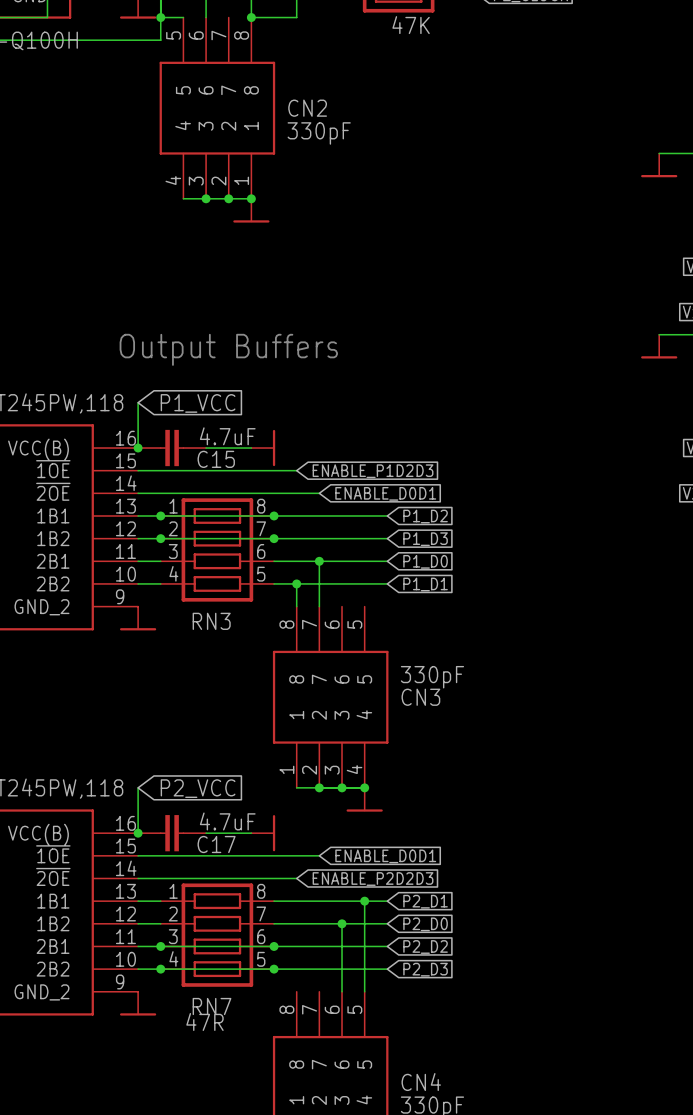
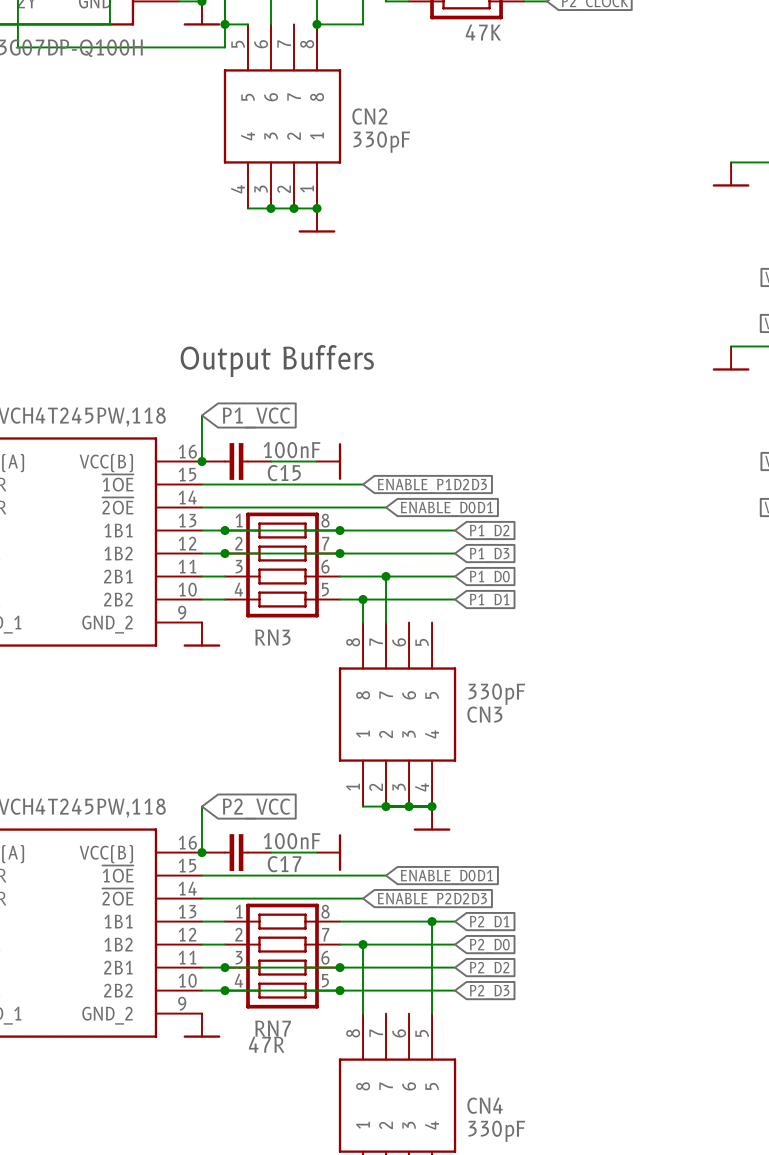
C15 value: 4.7uF (227, 436) -> 100nF (292, 450)
C17 value: 4.7uF (227, 821) -> 100nF (292, 841)
wire: (342, 923) (342, 991) -> (363, 944) (363, 1013)
junction position: (342, 923) -> (363, 944)

